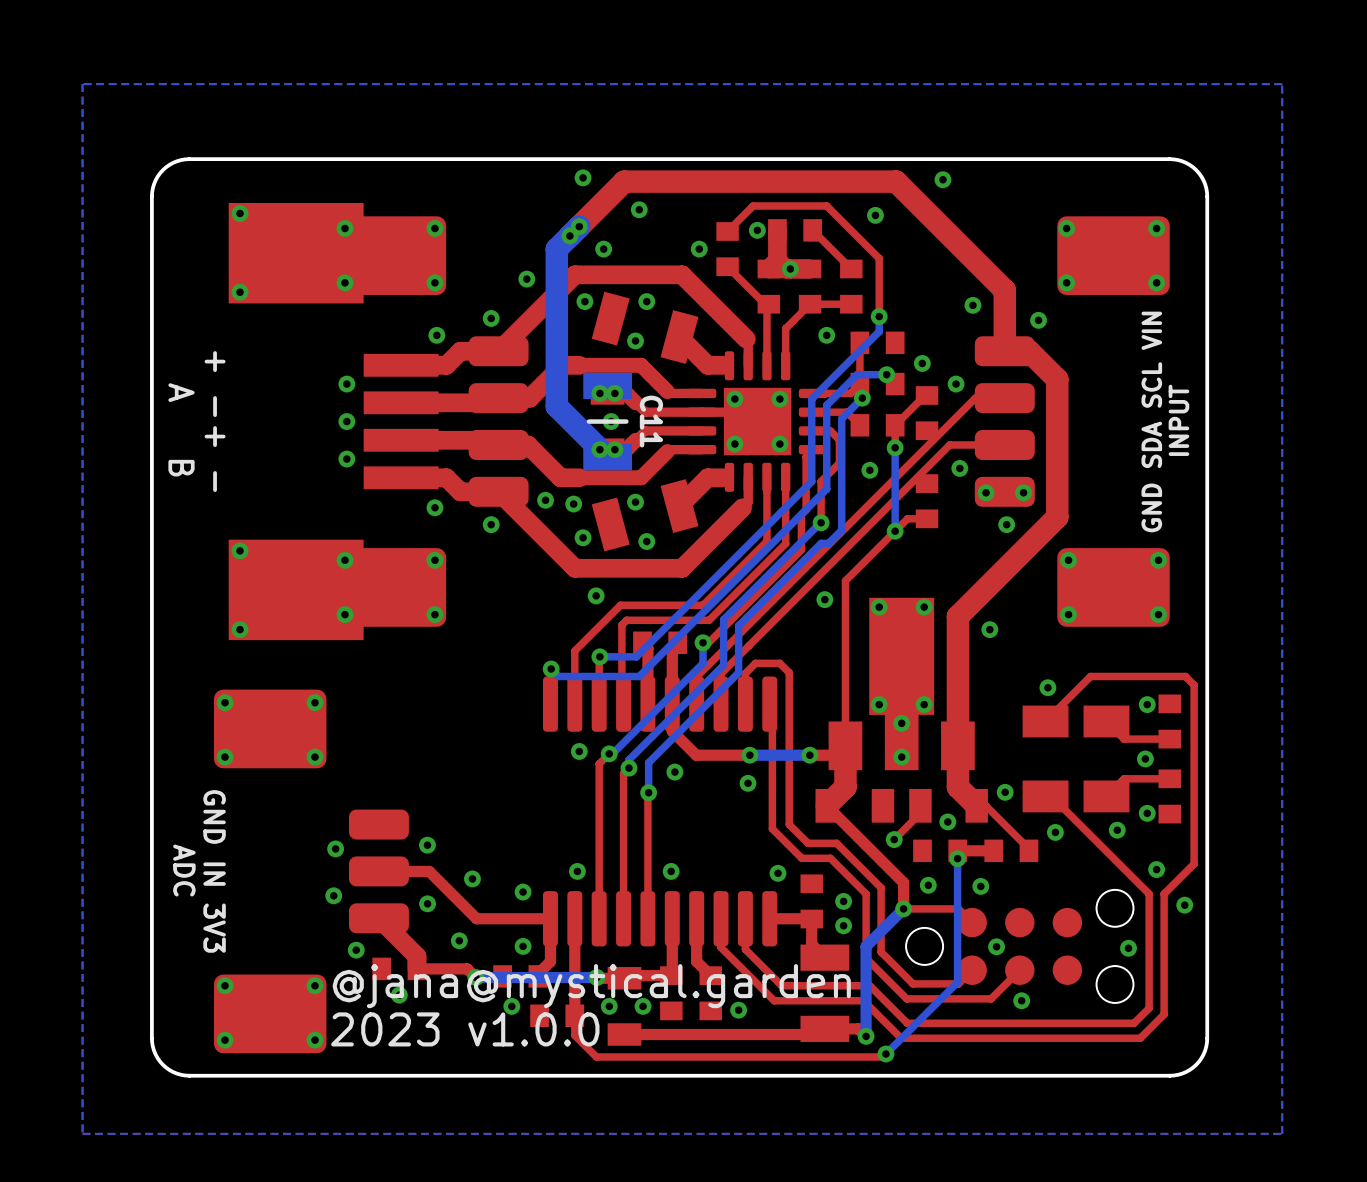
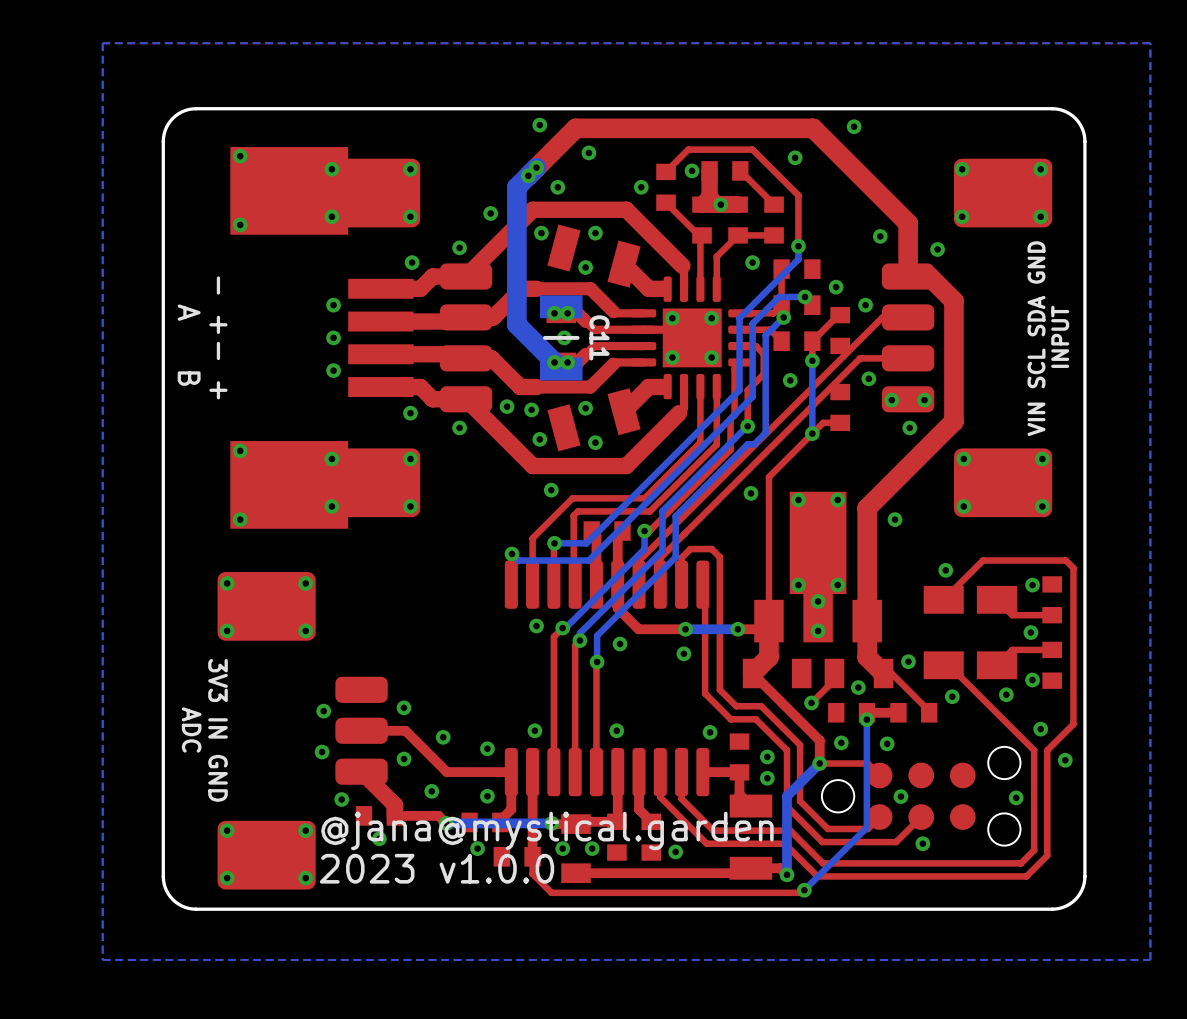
text: + - (215, 384) -> - + (218, 305)
text: GND SDA SCL VIN (1151, 421) -> VIN SCL SDA GND (1036, 338)
text: + - (215, 459) -> - + (218, 370)
text: GND IN 3V3 (214, 871) -> 3V3 IN GND (218, 730)

